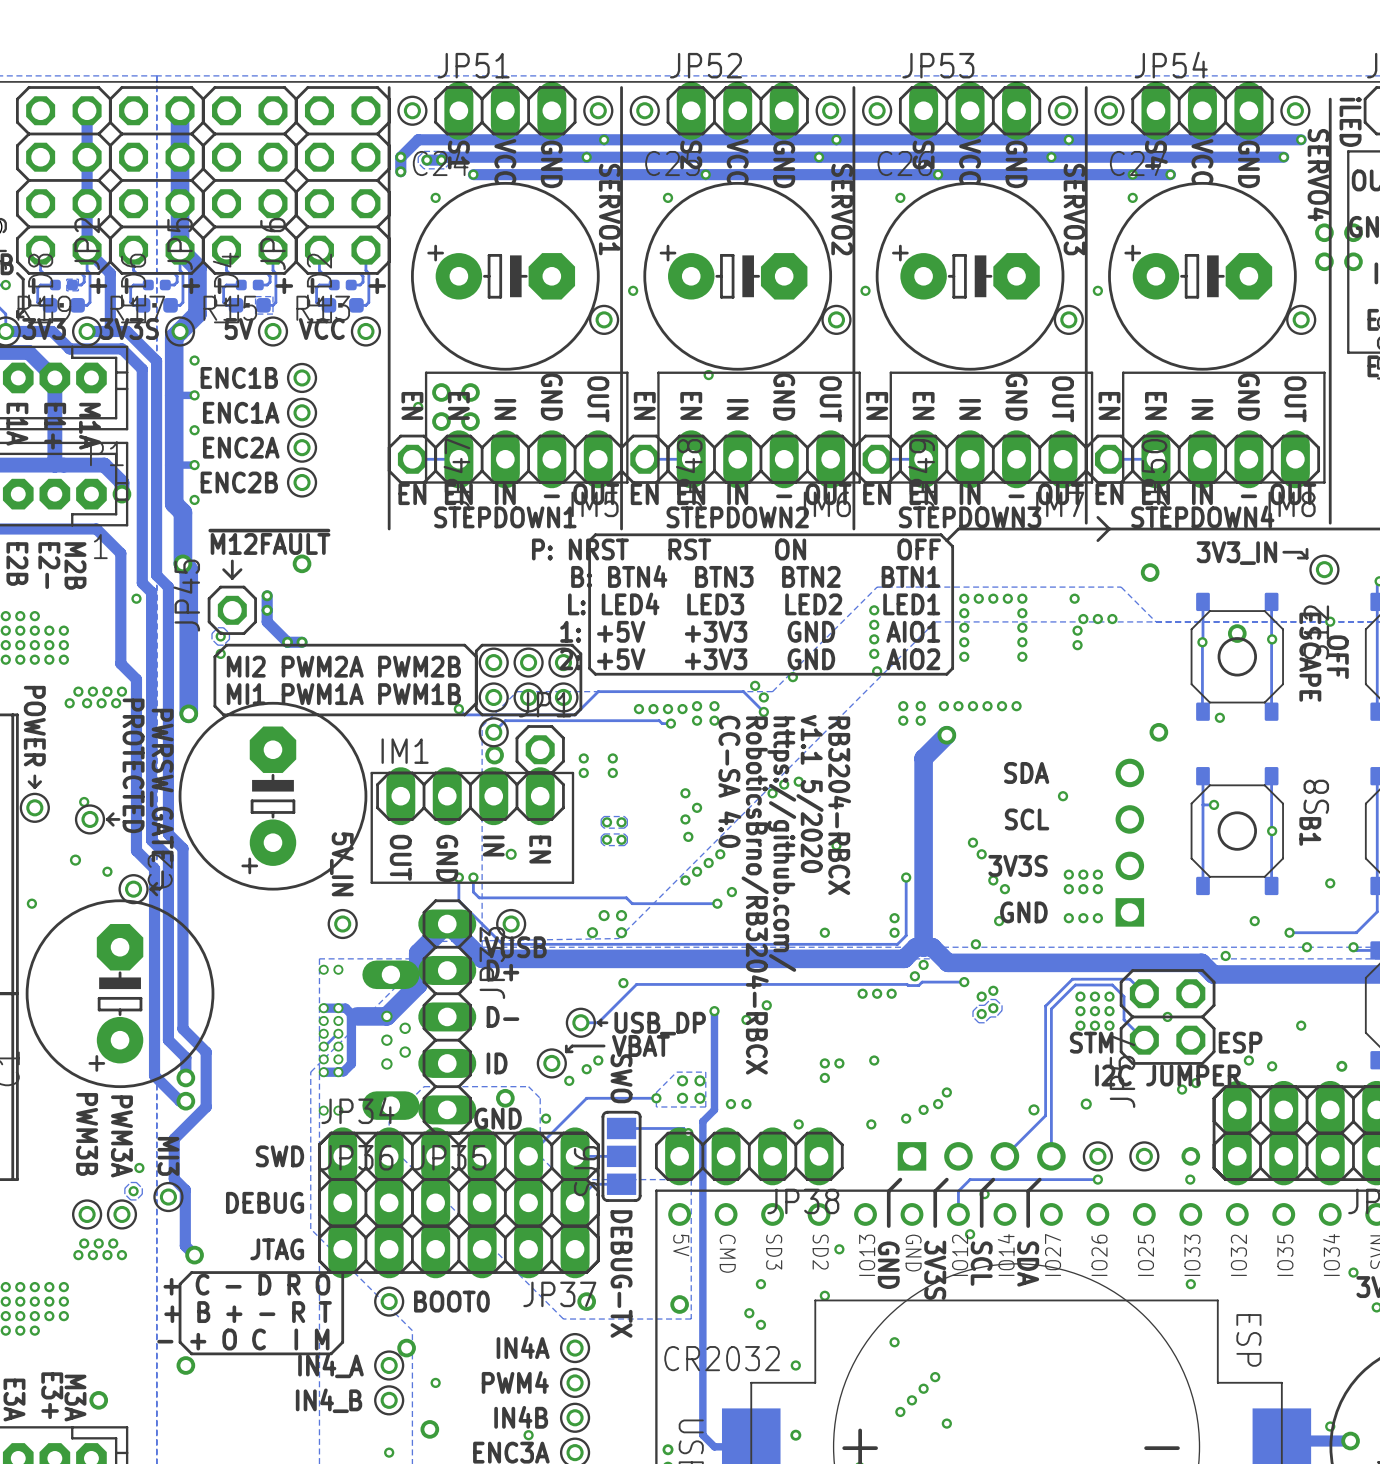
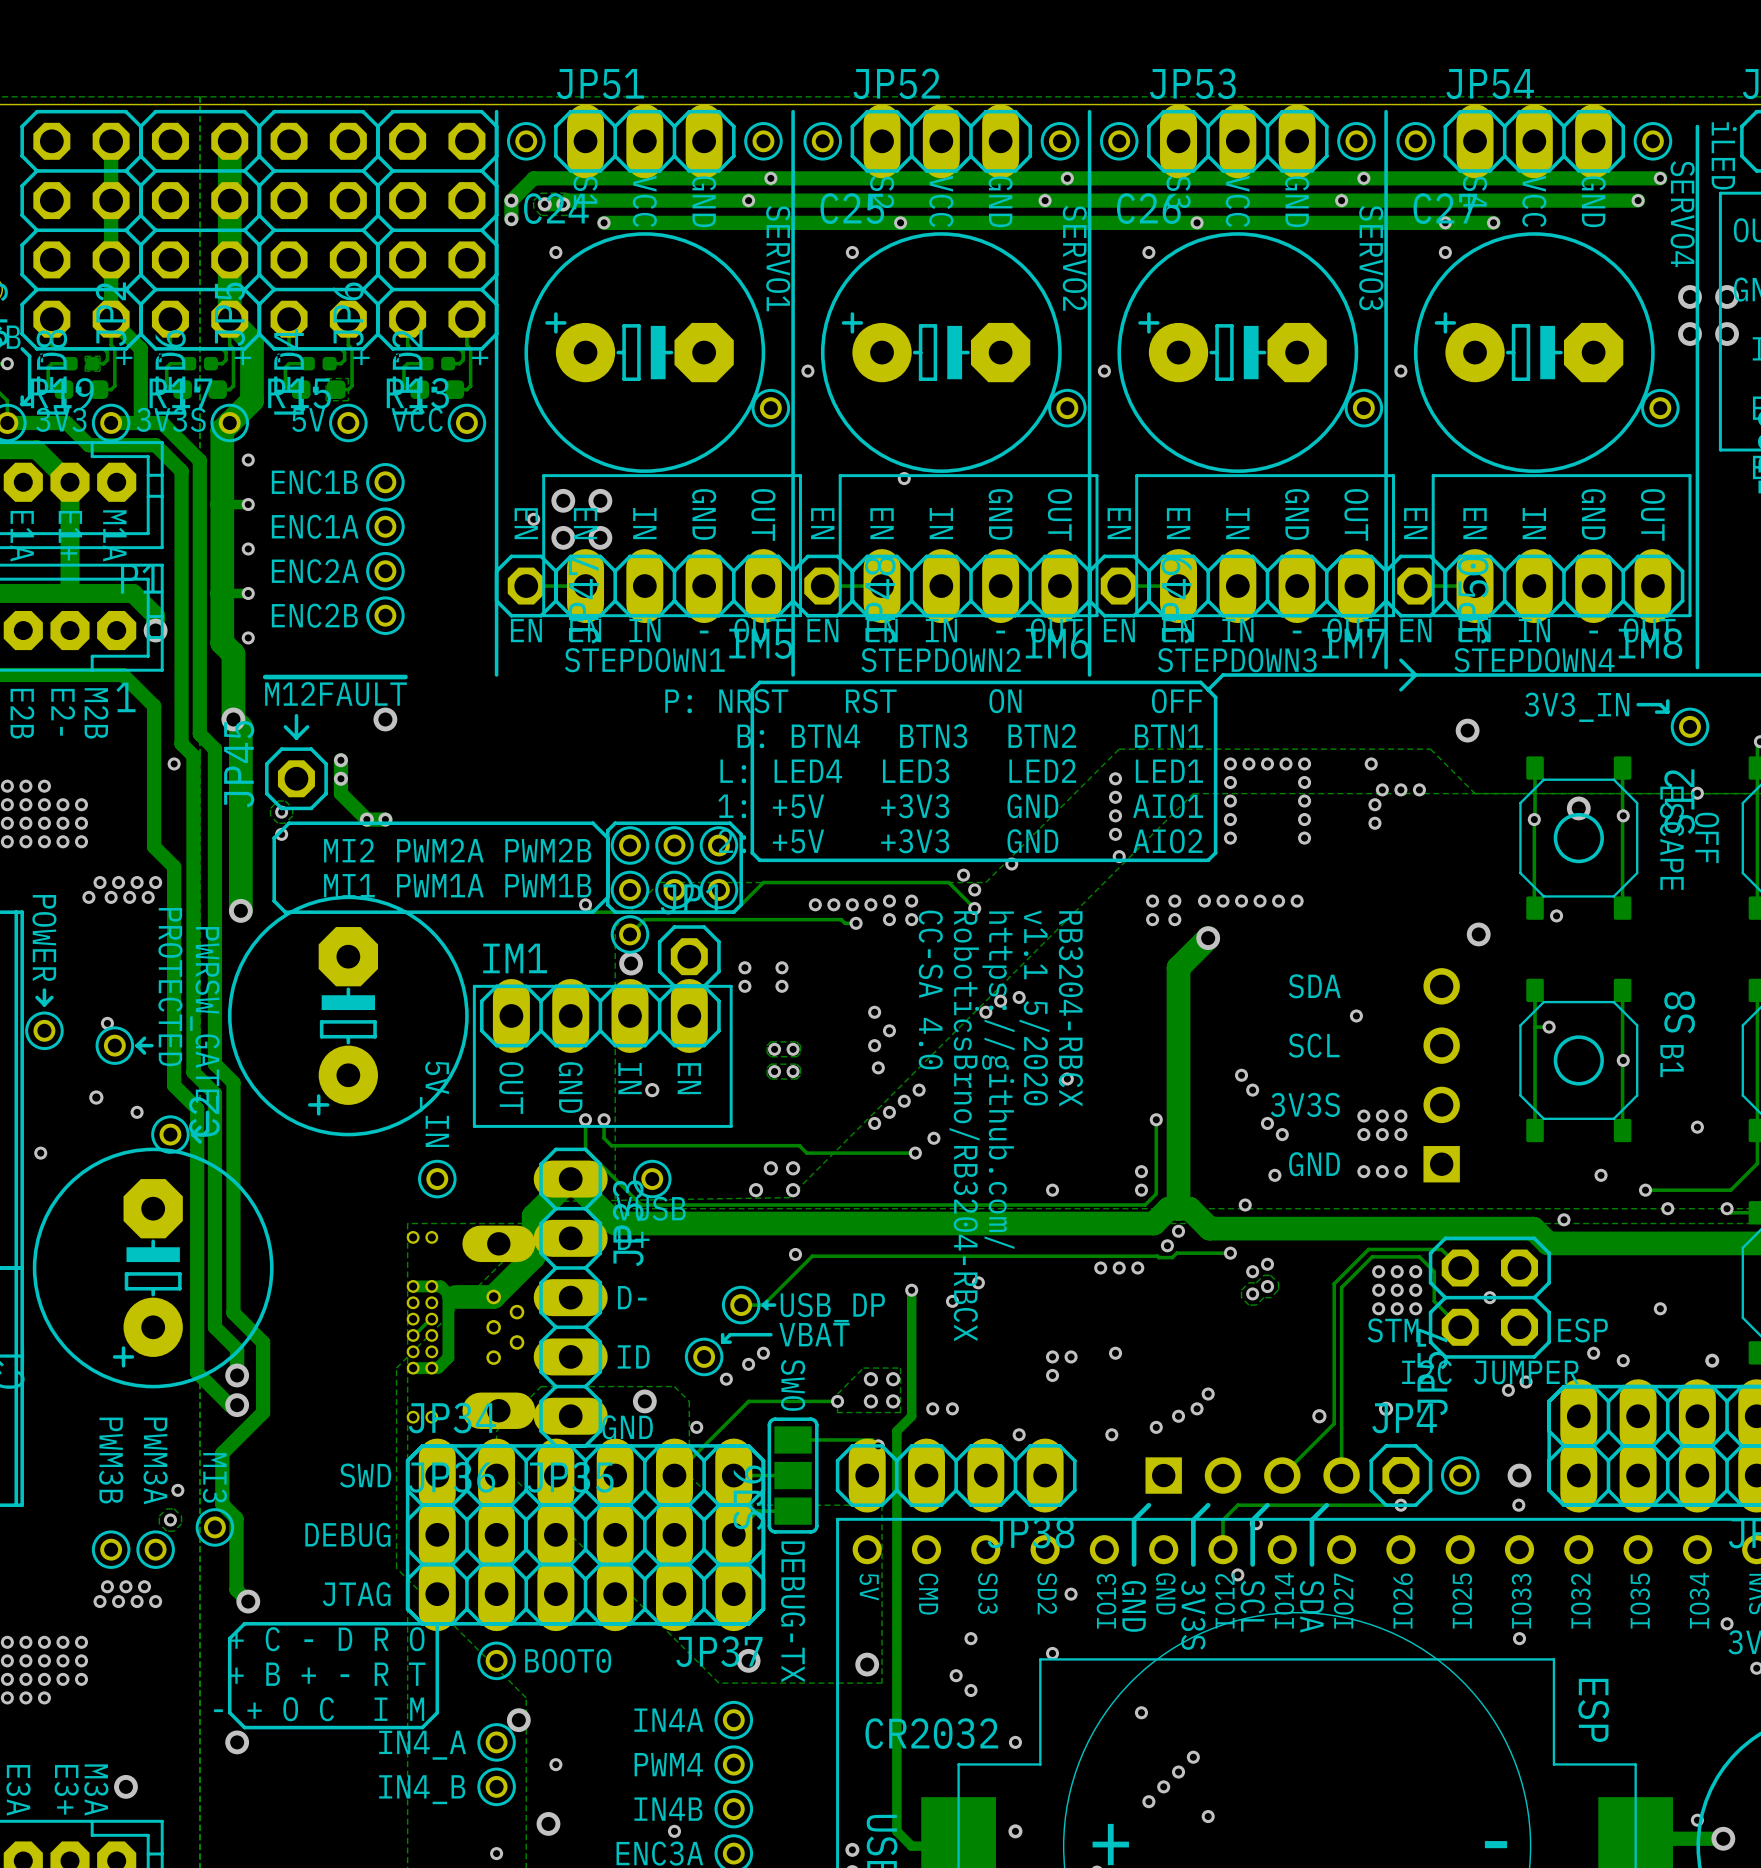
part: (1097, 1156) -> none
JP4: none -> (1400, 1475)

